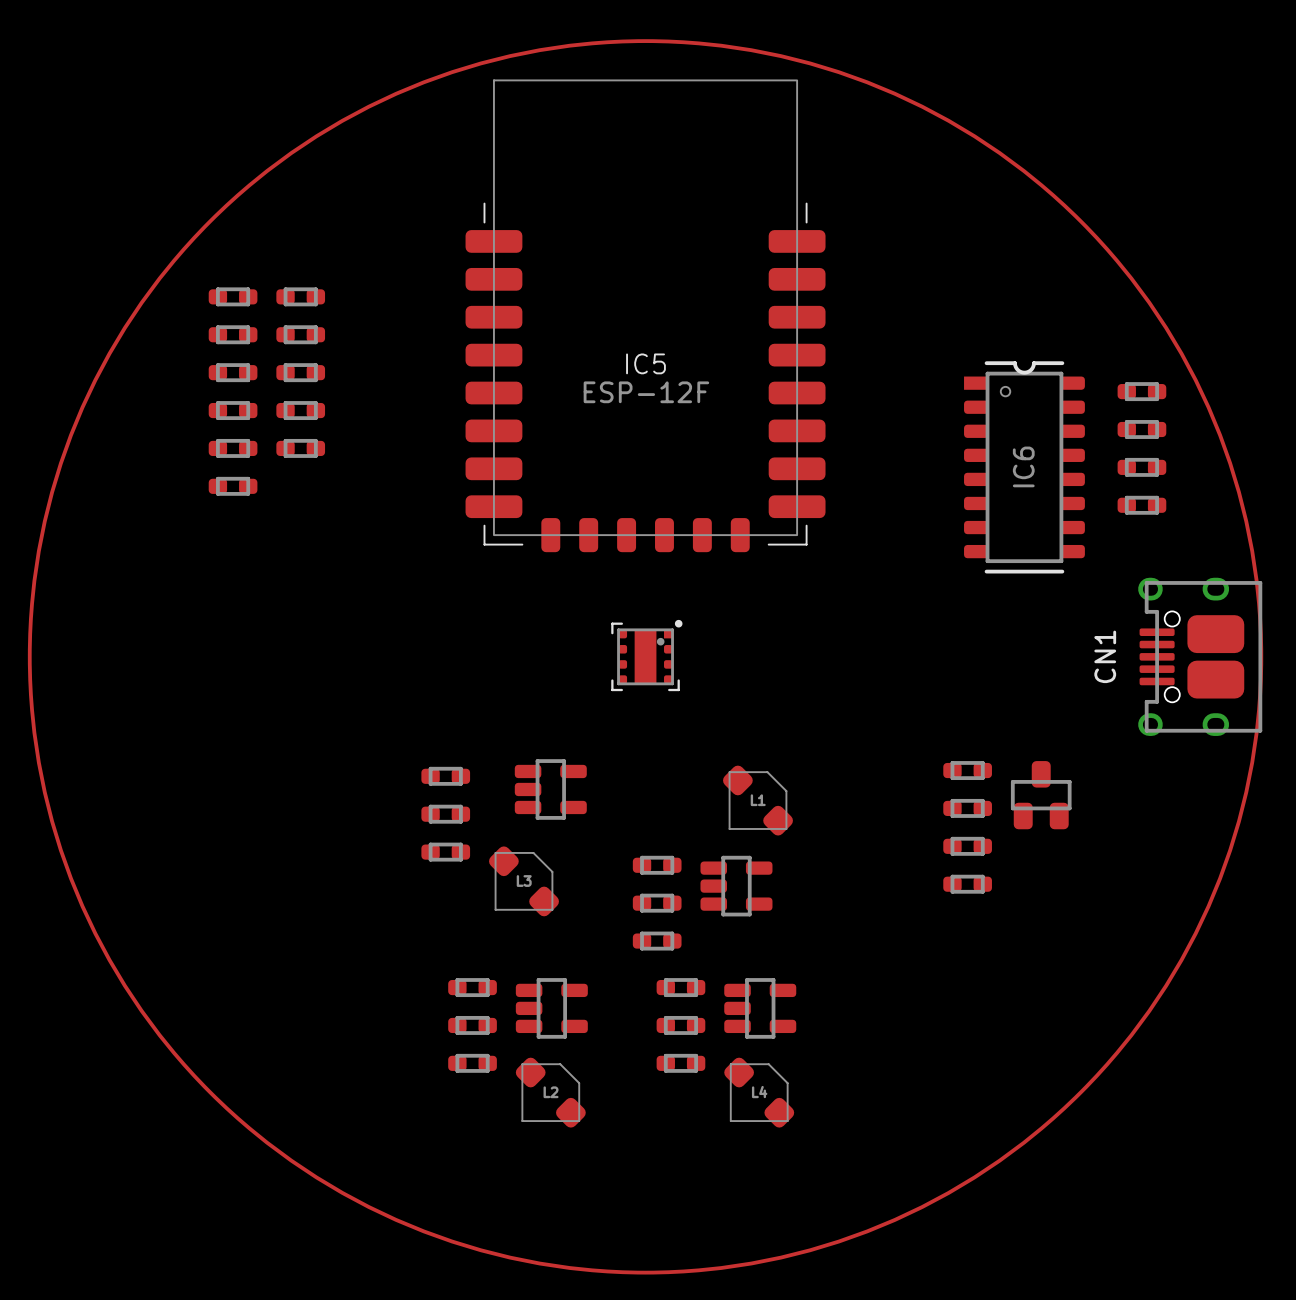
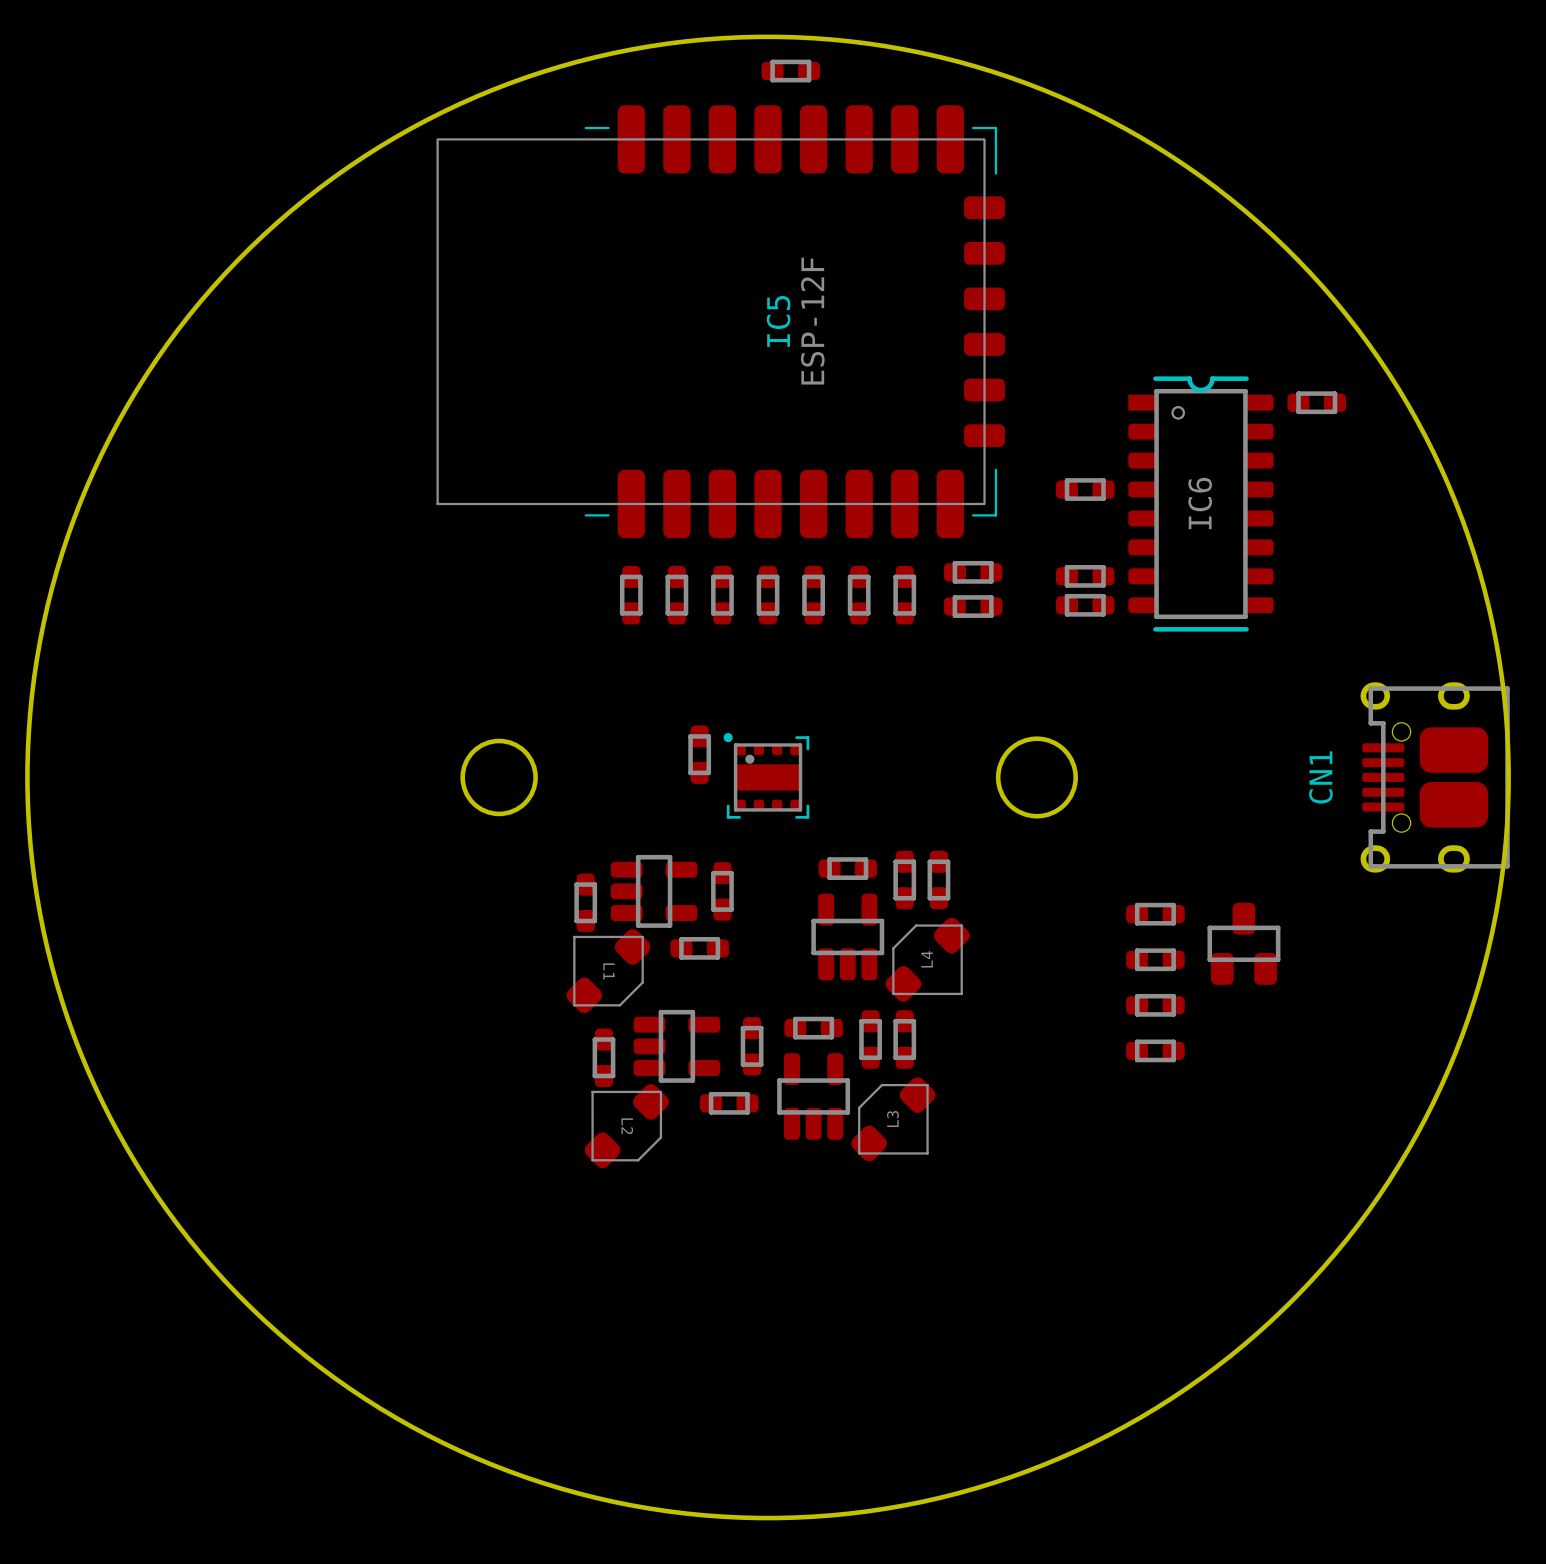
drawing: [27, 39, 1264, 1275] -> none
round board edge: none -> [25, 34, 1511, 1521]
part: none -> (790, 71)
part: (233, 296) -> none
part: (300, 296) -> none
IC5 rotation: 0° (645, 315) -> 90° counterclockwise (720, 321)
part: (233, 334) -> none
part: (300, 334) -> none
part: none -> (1316, 402)
part: (233, 372) -> none
part: (300, 372) -> none
part: (1141, 391) -> none
part: (233, 410) -> none
part: (300, 410) -> none
part: none -> (1085, 489)
part: (1141, 429) -> none
part: (233, 448) -> none
part: (300, 448) -> none
IC6 position: (1024, 467) -> (1201, 504)
part: (1141, 467) -> none
part: (233, 486) -> none
part: none -> (973, 572)
part: none -> (1085, 576)
part: none -> (631, 595)
part: none -> (676, 595)
part: none -> (722, 595)
part: none -> (768, 595)
part: none -> (813, 595)
part: none -> (859, 595)
part: none -> (904, 595)
part: (1141, 505) -> none
part: none -> (1085, 605)
part: none -> (973, 606)
round board edge: none -> [995, 736, 1078, 819]
round board edge: none -> [460, 738, 538, 817]
part: none -> (699, 754)
part rotation: 0° (646, 655) -> 90° counterclockwise (766, 775)
part: none -> (847, 868)
part: none -> (904, 880)
part: none -> (938, 880)
part: none -> (722, 891)
part: none -> (585, 902)
part: (445, 776) -> none
part position: (550, 789) -> (654, 891)
part: none -> (847, 936)
part: none -> (699, 948)
L1 rotation: 0° (757, 800) -> 90° clockwise (608, 971)
L1 position: (757, 800) -> (608, 971)
part: (445, 814) -> none
part: (445, 852) -> none
part: (657, 865) -> none
part: none -> (813, 1028)
part: none -> (870, 1039)
part: none -> (904, 1039)
part: none -> (676, 1046)
part: none -> (752, 1046)
L3 rotation: 0° (523, 881) -> 90° counterclockwise (893, 1119)
L3 position: (523, 881) -> (893, 1119)
part: (736, 886) -> none
part: none -> (603, 1057)
part: (657, 903) -> none
part: none -> (813, 1096)
part: none -> (729, 1103)
part: (657, 941) -> none
part: (472, 987) -> none
part: (680, 987) -> none
part: (551, 1008) -> none
part: (760, 1008) -> none
part: (472, 1025) -> none
part: (680, 1025) -> none
part: (472, 1063) -> none
part: (680, 1063) -> none
L2 rotation: 0° (550, 1092) -> 90° clockwise (626, 1126)
L2 position: (550, 1092) -> (626, 1126)
L4 rotation: 0° (759, 1092) -> 90° counterclockwise (927, 959)
L4 position: (759, 1092) -> (927, 959)

